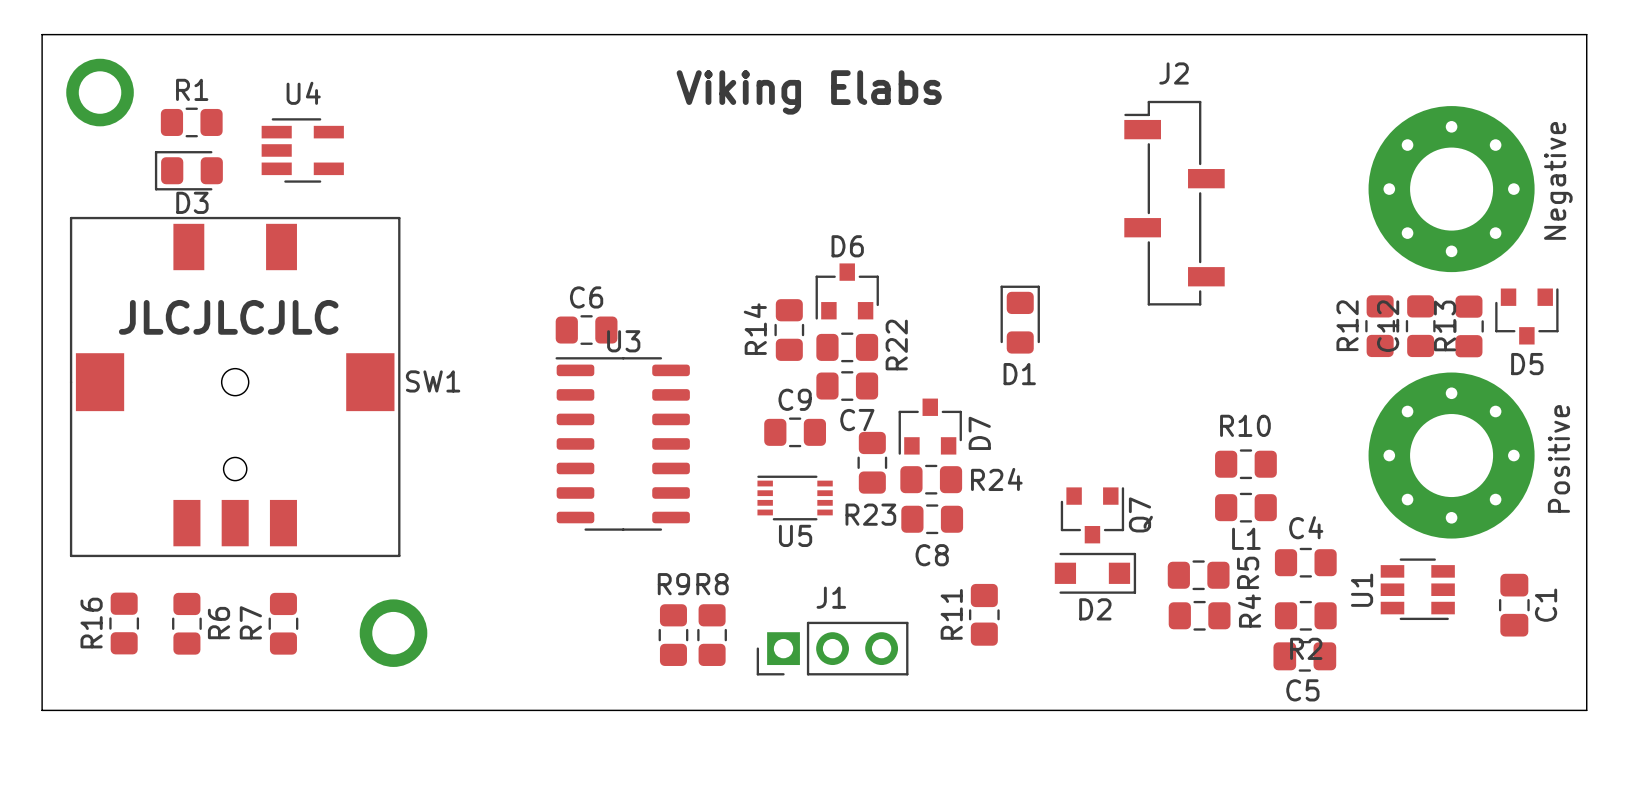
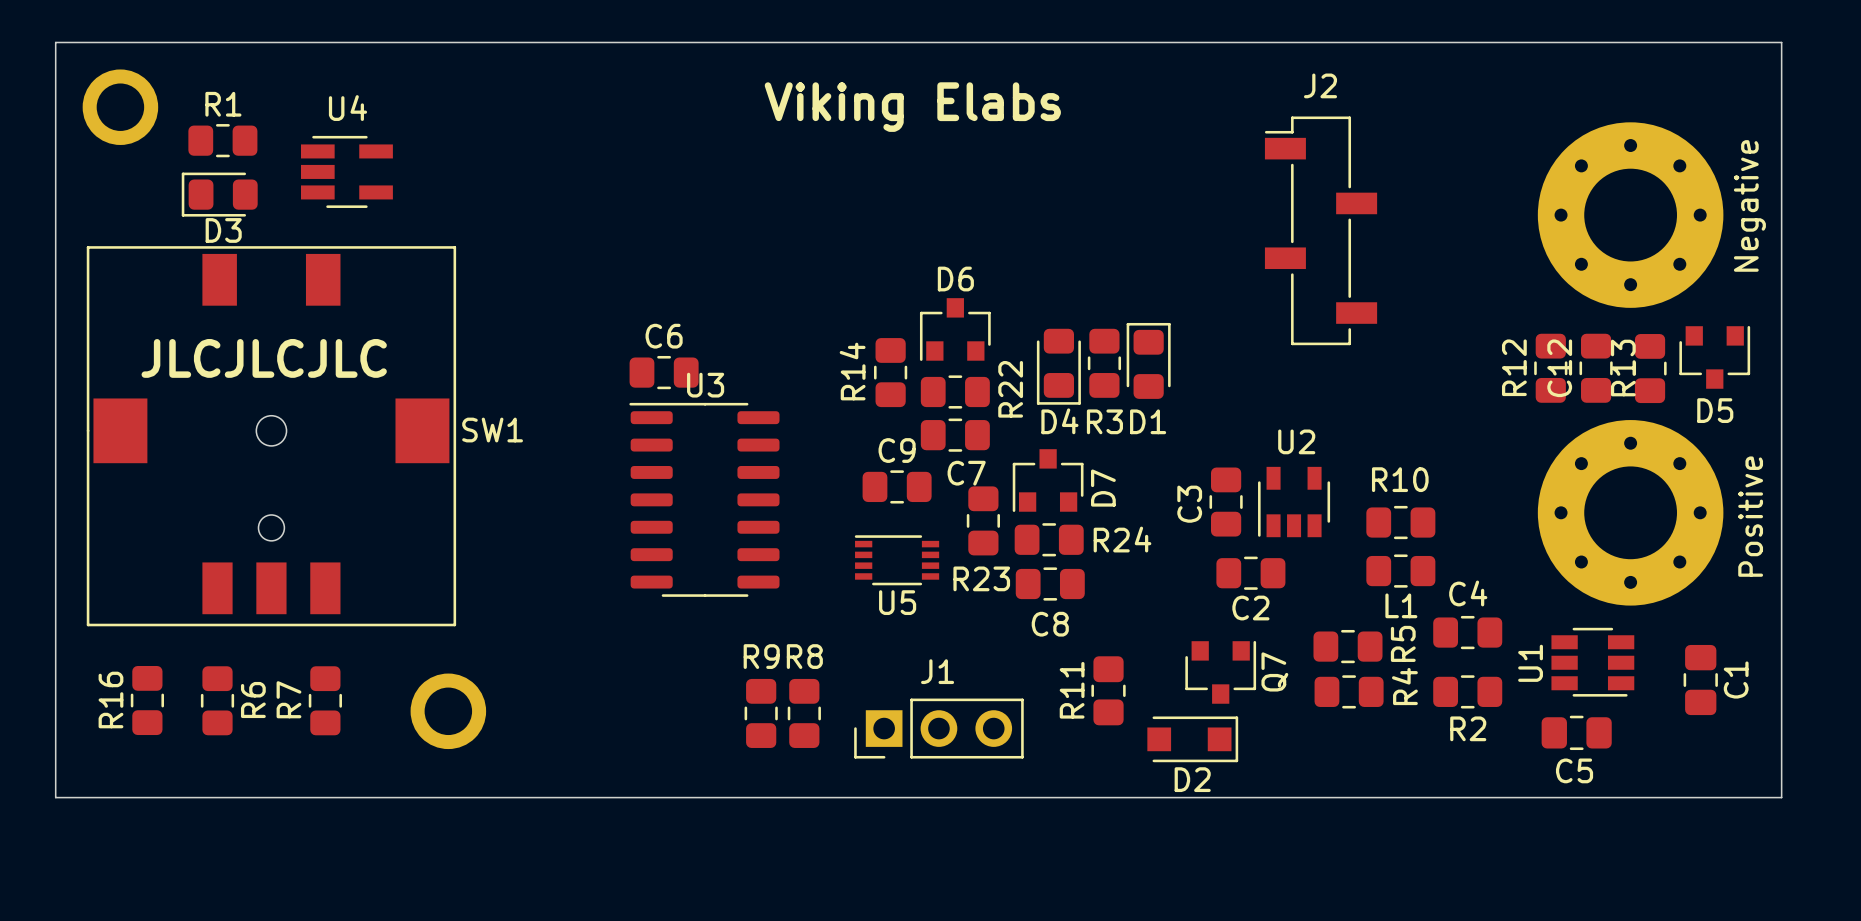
R3: none -> (1104, 363)
D4: none -> (1058, 366)
C3: none -> (1226, 502)
U2: none -> (1294, 502)
C2: none -> (1250, 573)
Q7 position: (1092, 515) -> (1220, 672)
D2 position: (1095, 573) -> (1192, 739)
C5 position: (1304, 656) -> (1576, 732)

